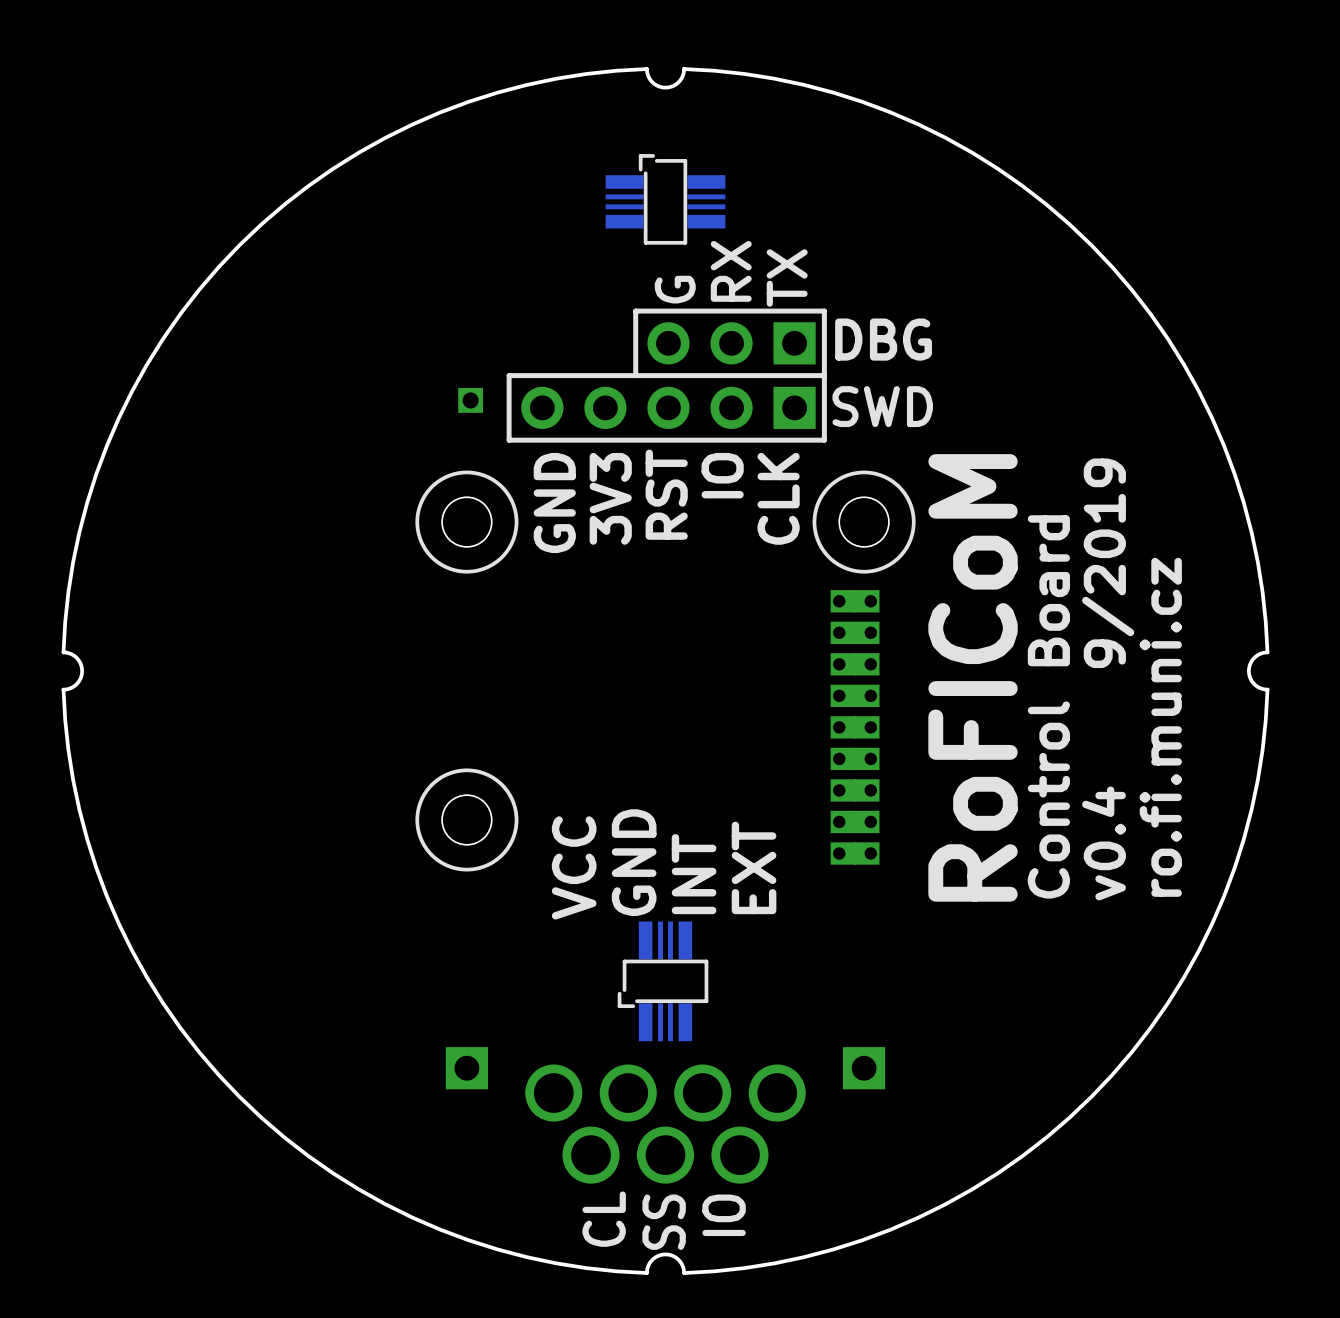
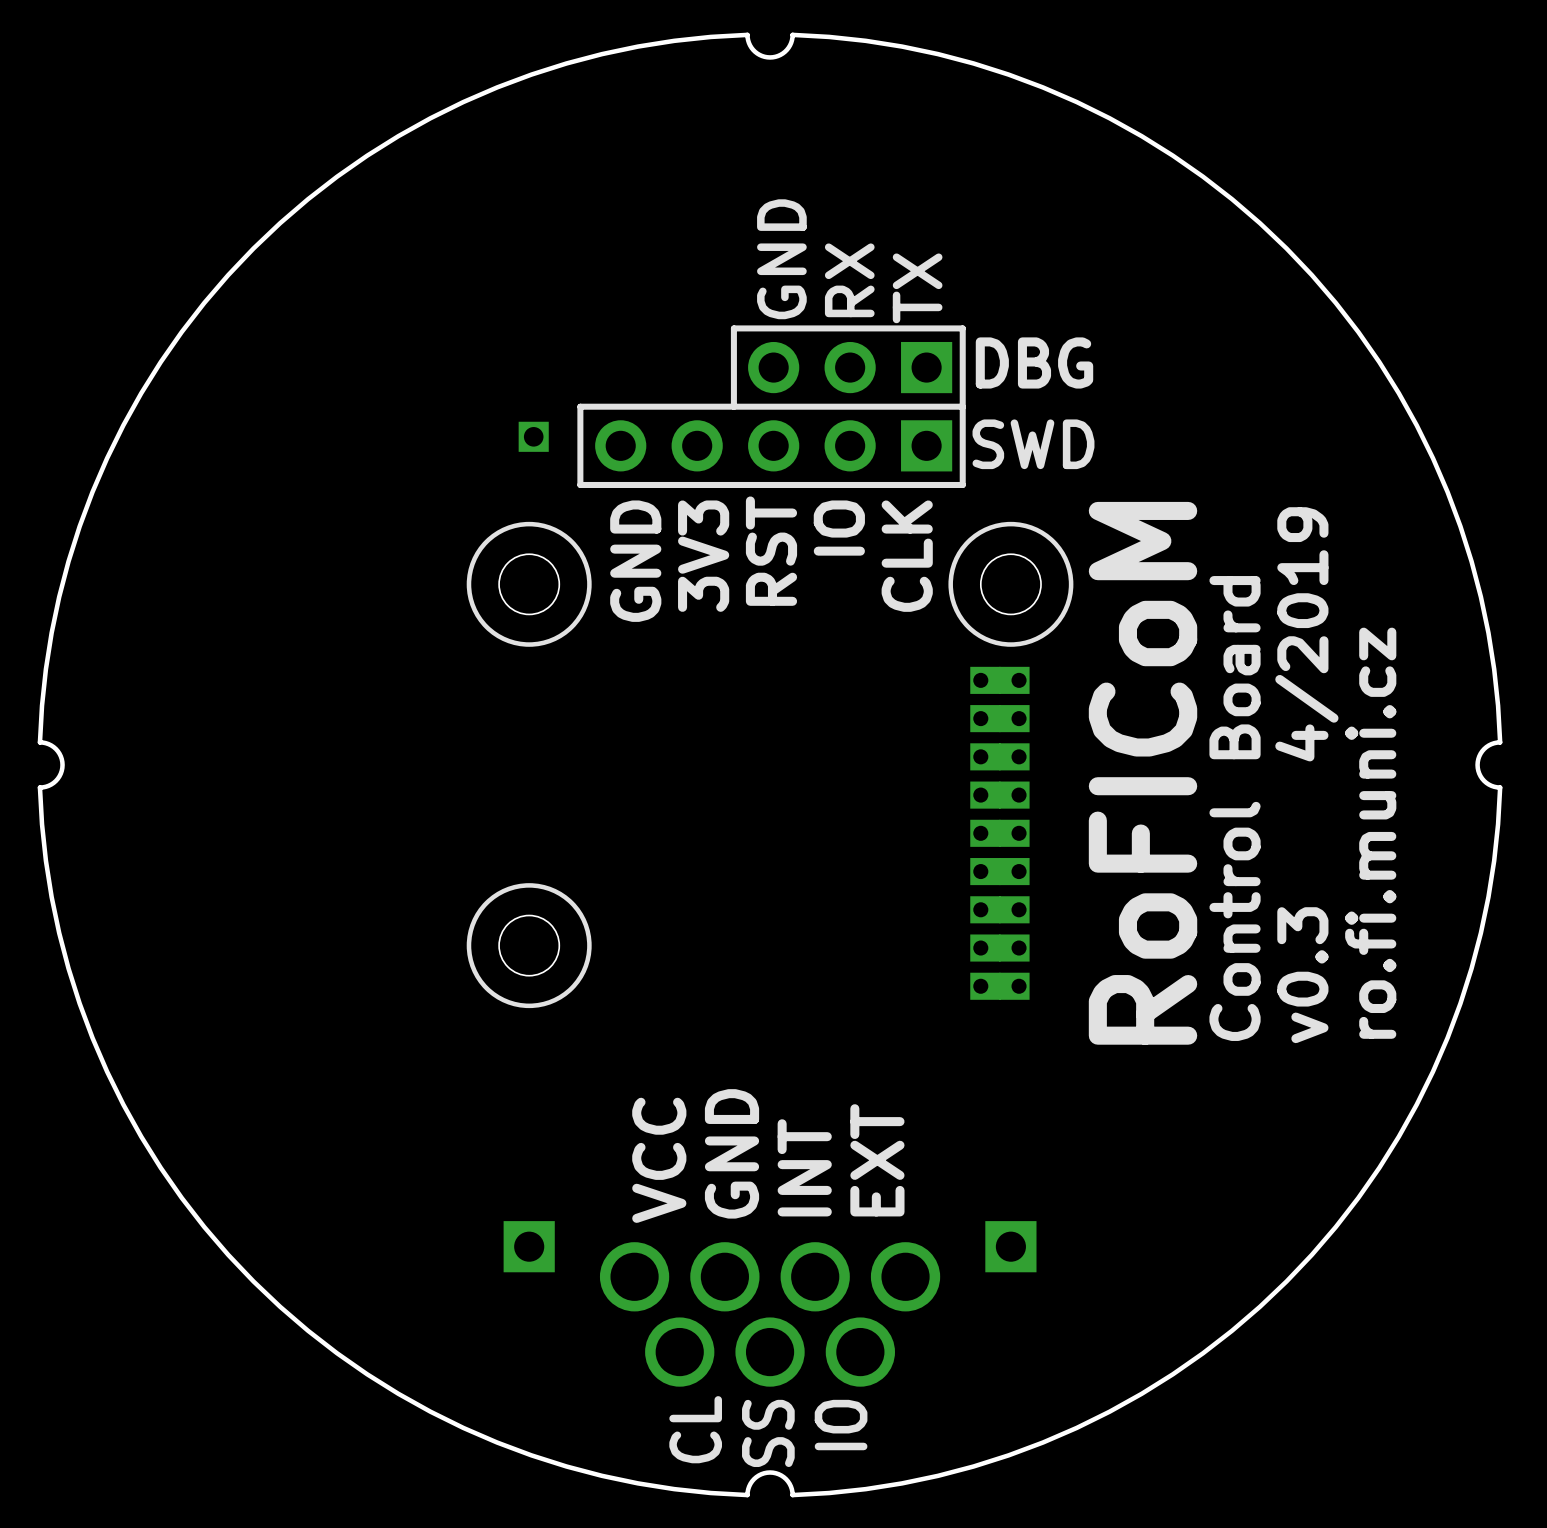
part: (665, 199) -> none
text: G (675, 289) -> GND (781, 259)
text: v0.4 9/2019 (1108, 679) -> v0.3 4/2019 (1306, 775)
text position: GND (634, 862) -> GND (732, 1153)
text position: VCC (574, 867) -> VCC (659, 1160)
text position: EXT (754, 867) -> EXT (877, 1160)
text position: INT (694, 874) -> INT (804, 1167)
part: (663, 981) -> none

